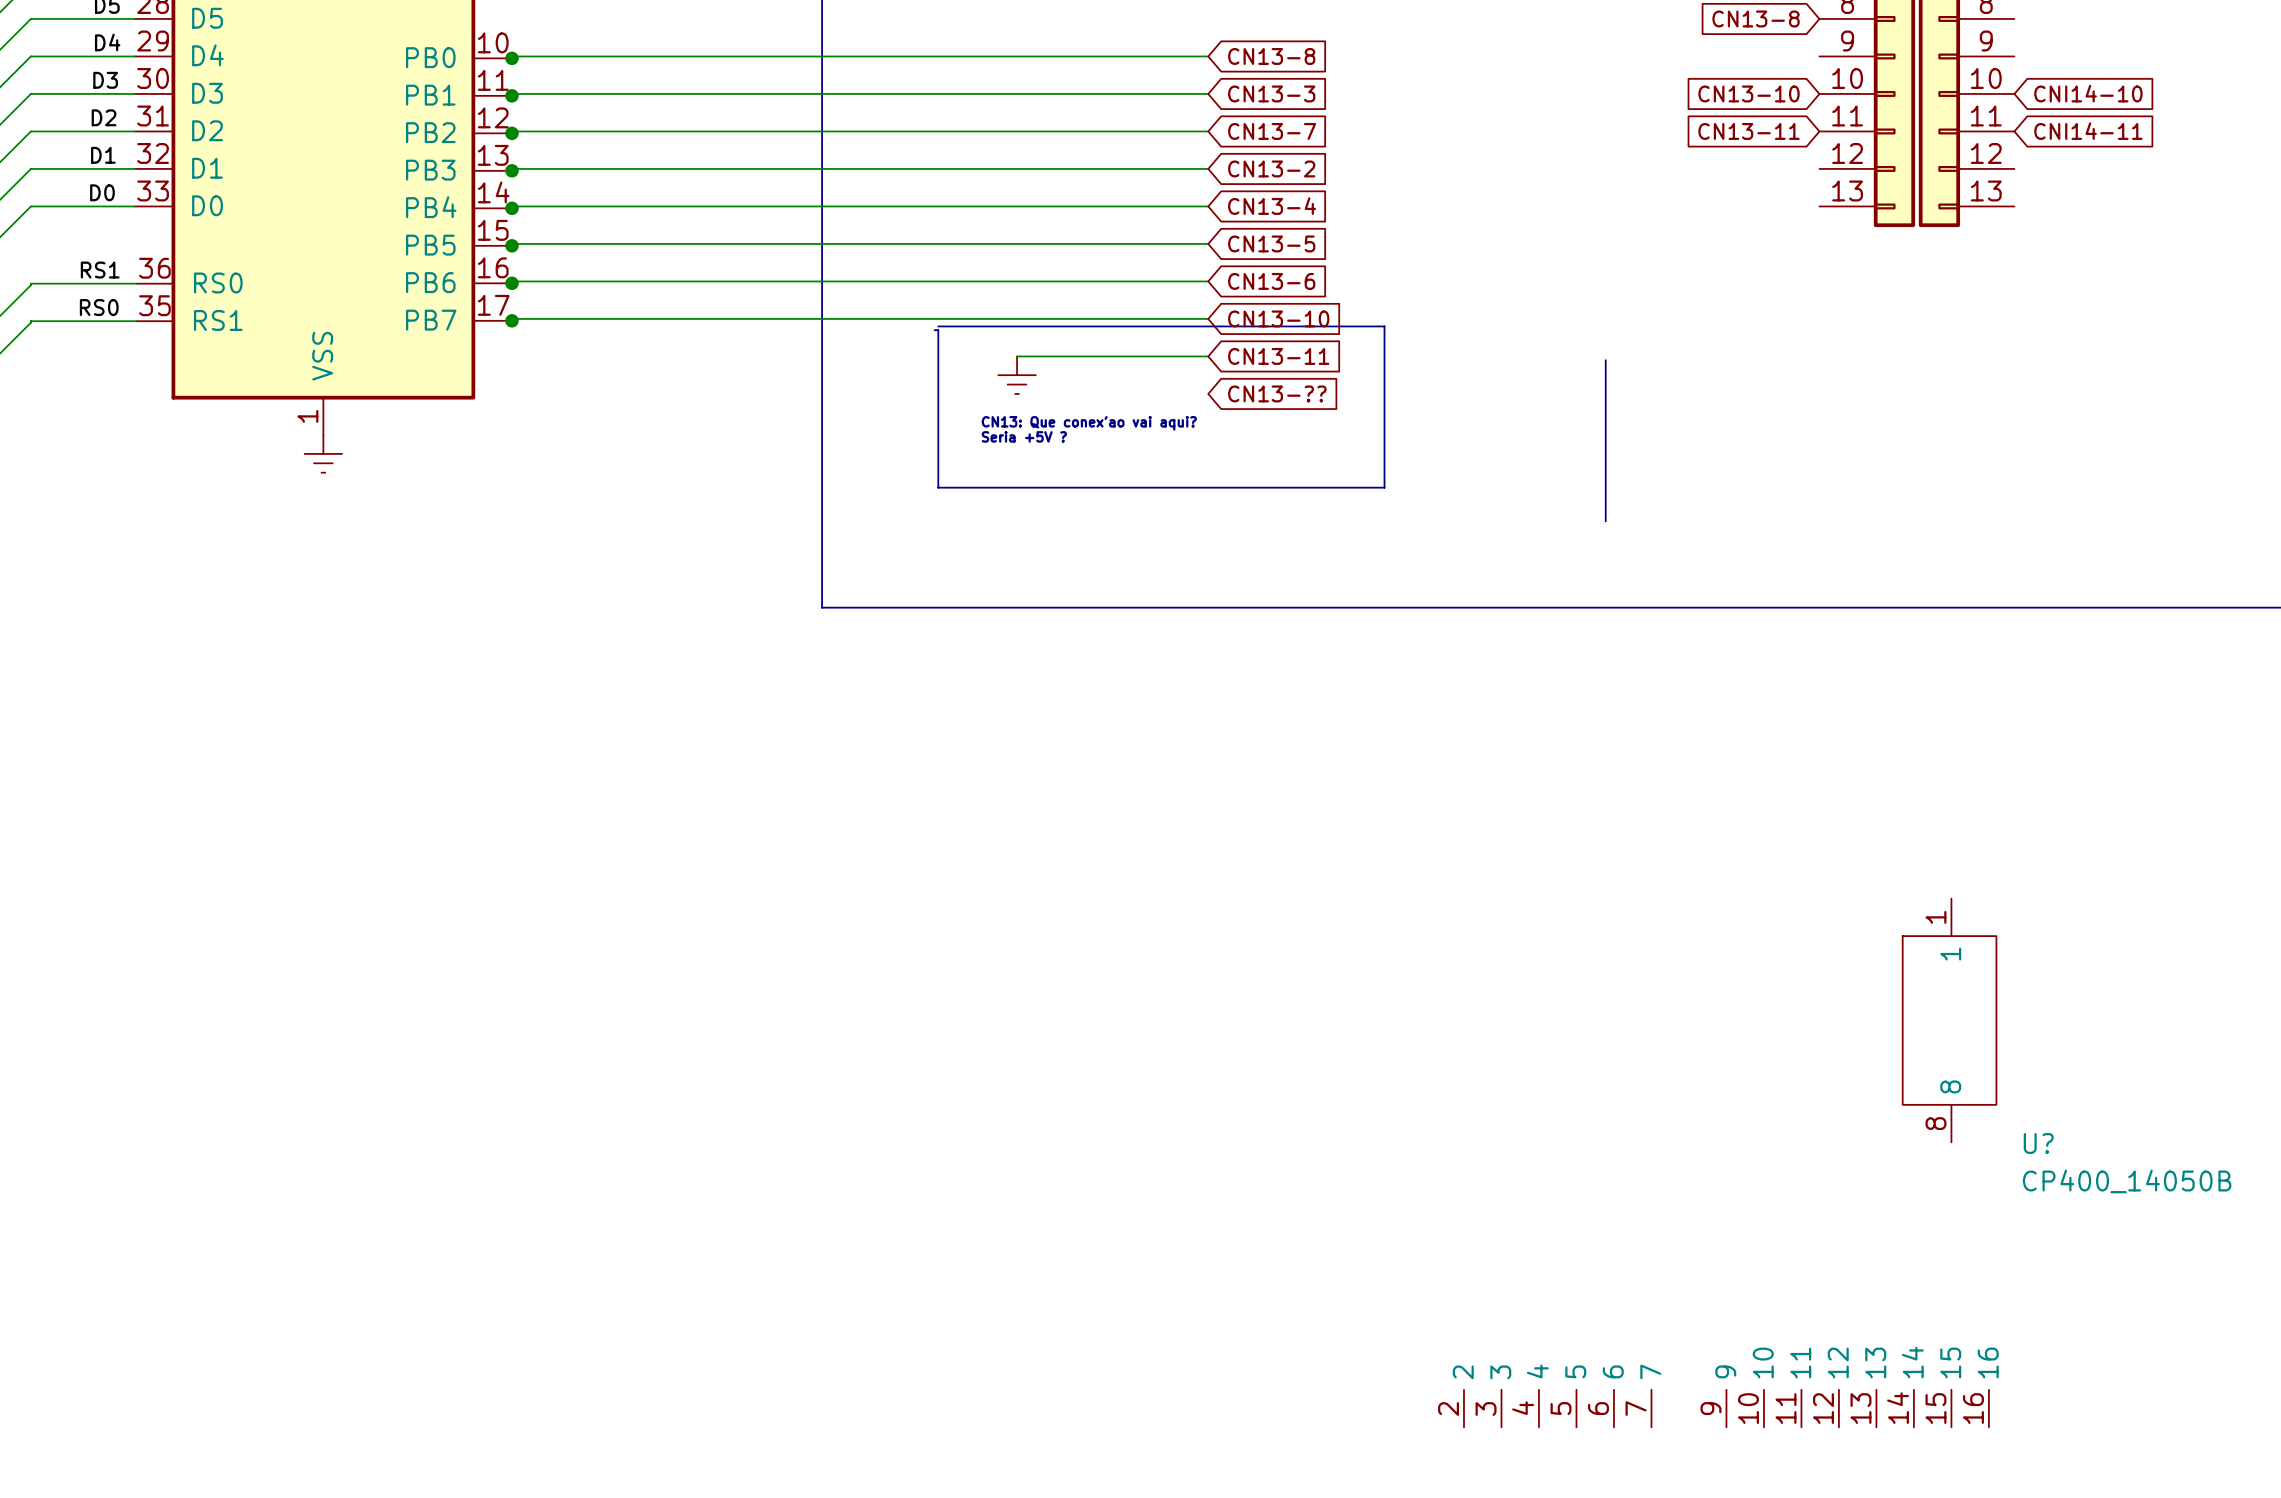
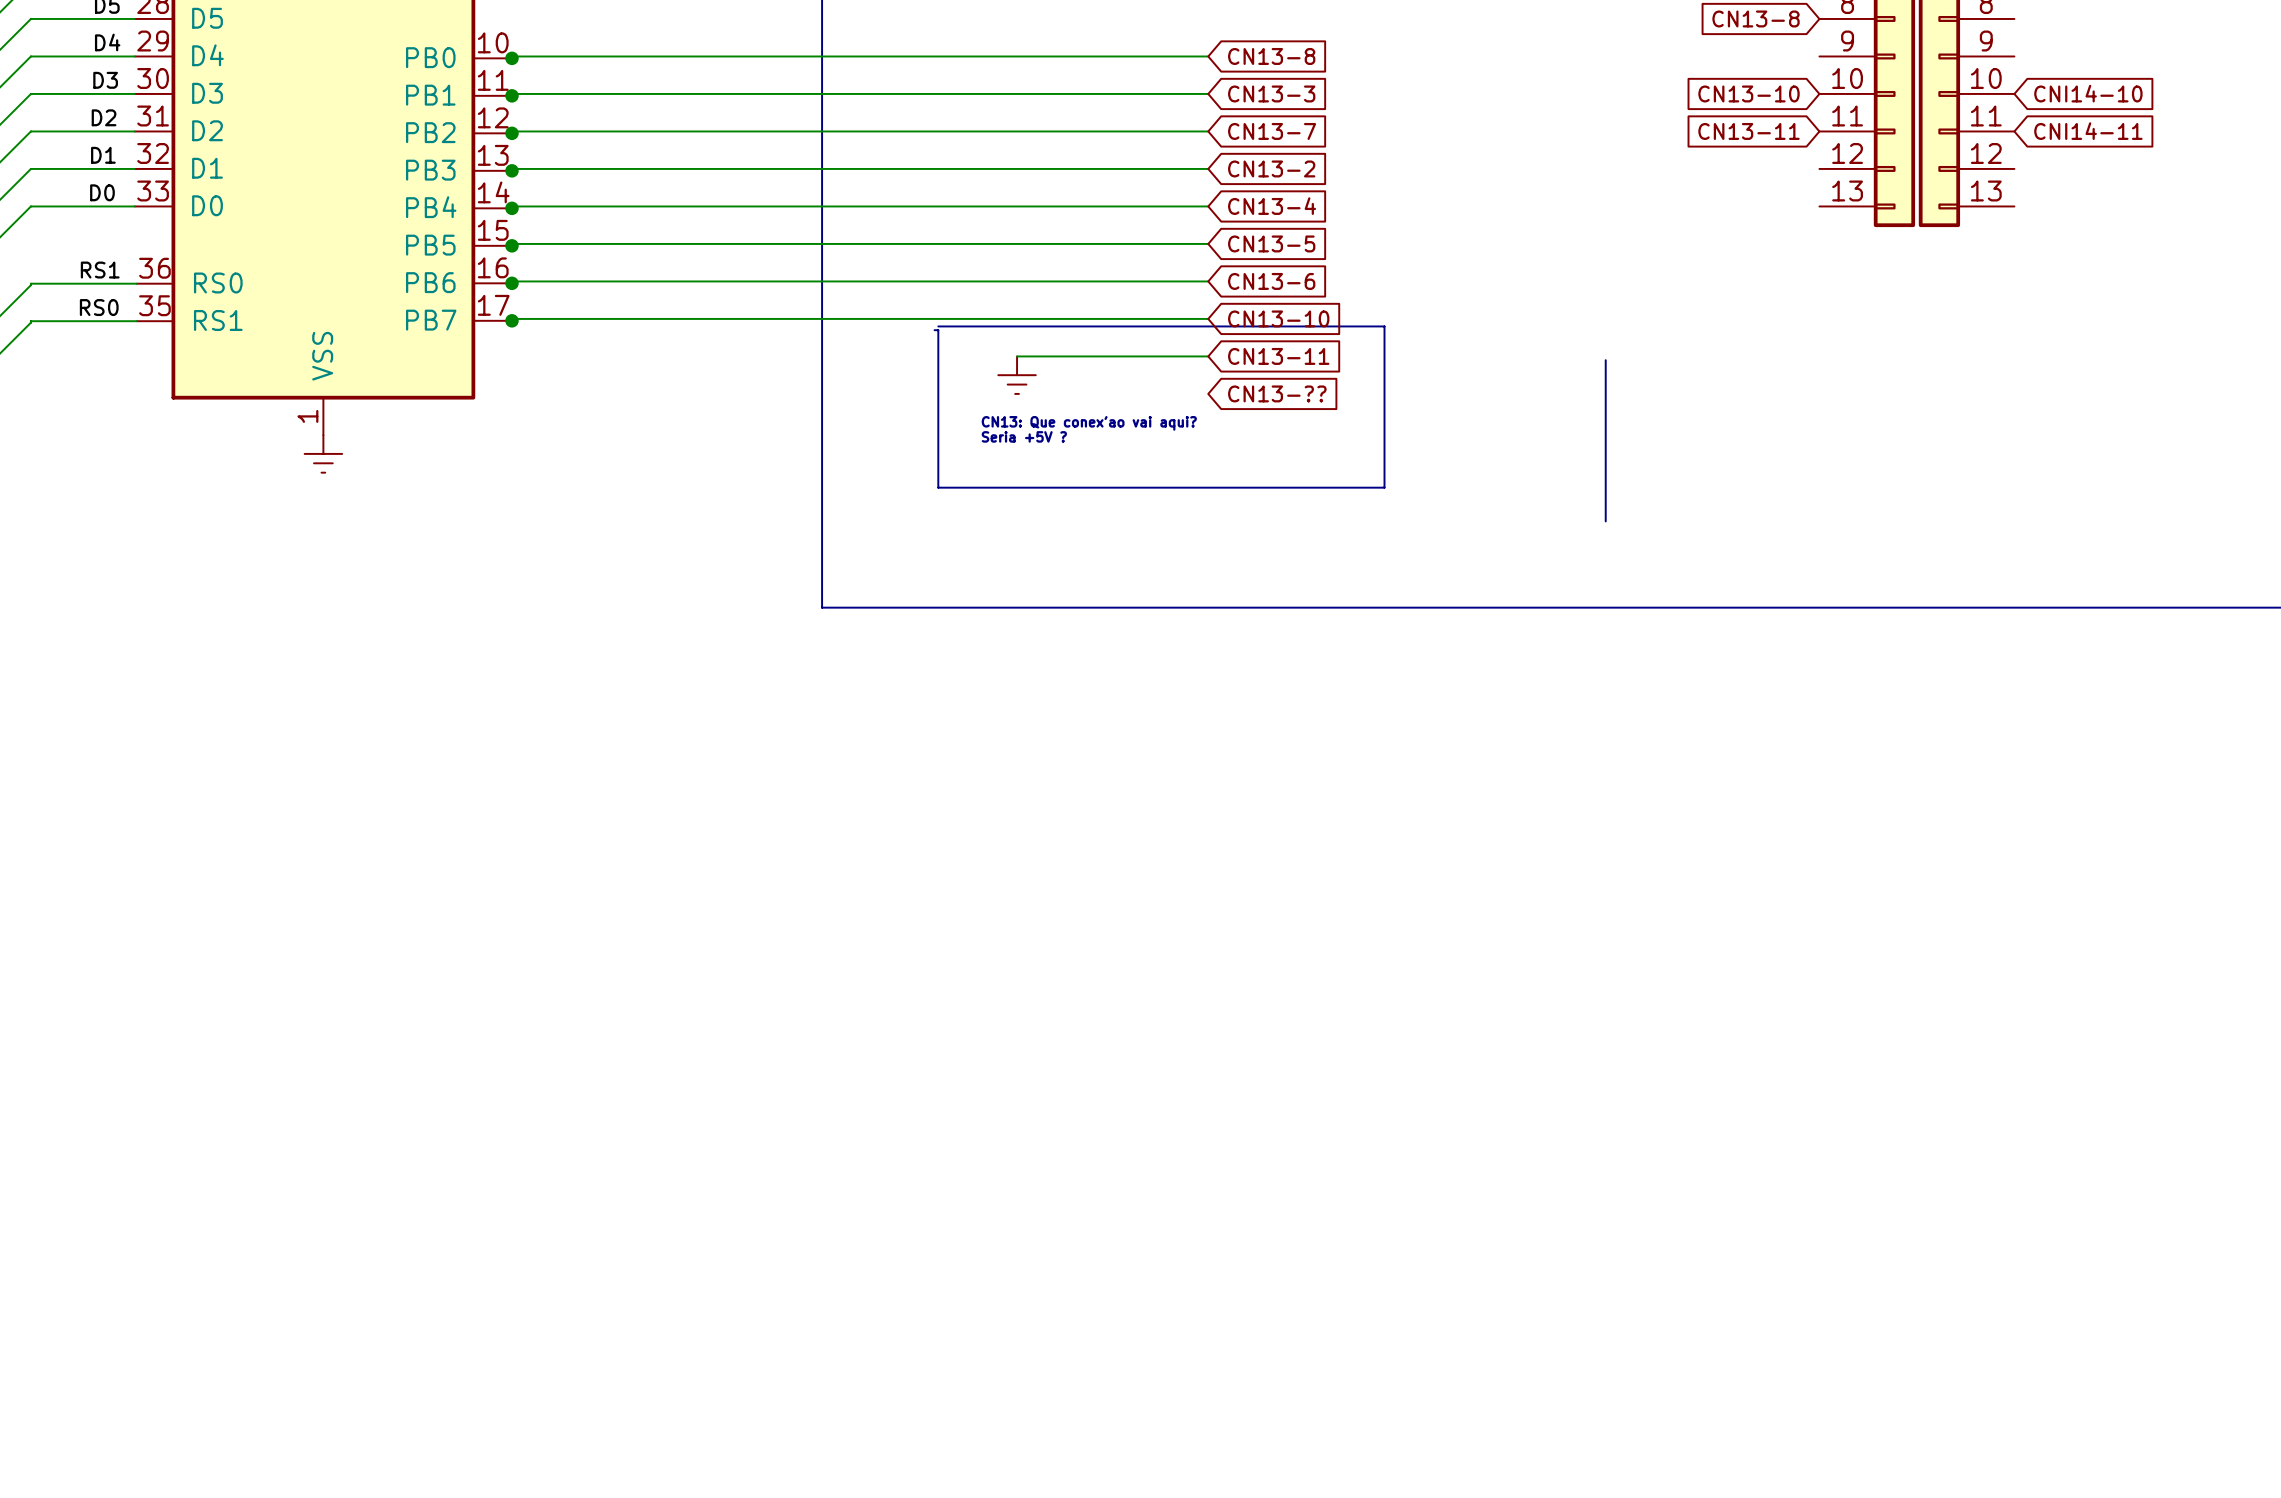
U?: CP400_14050B (1730, 1162) -> none

